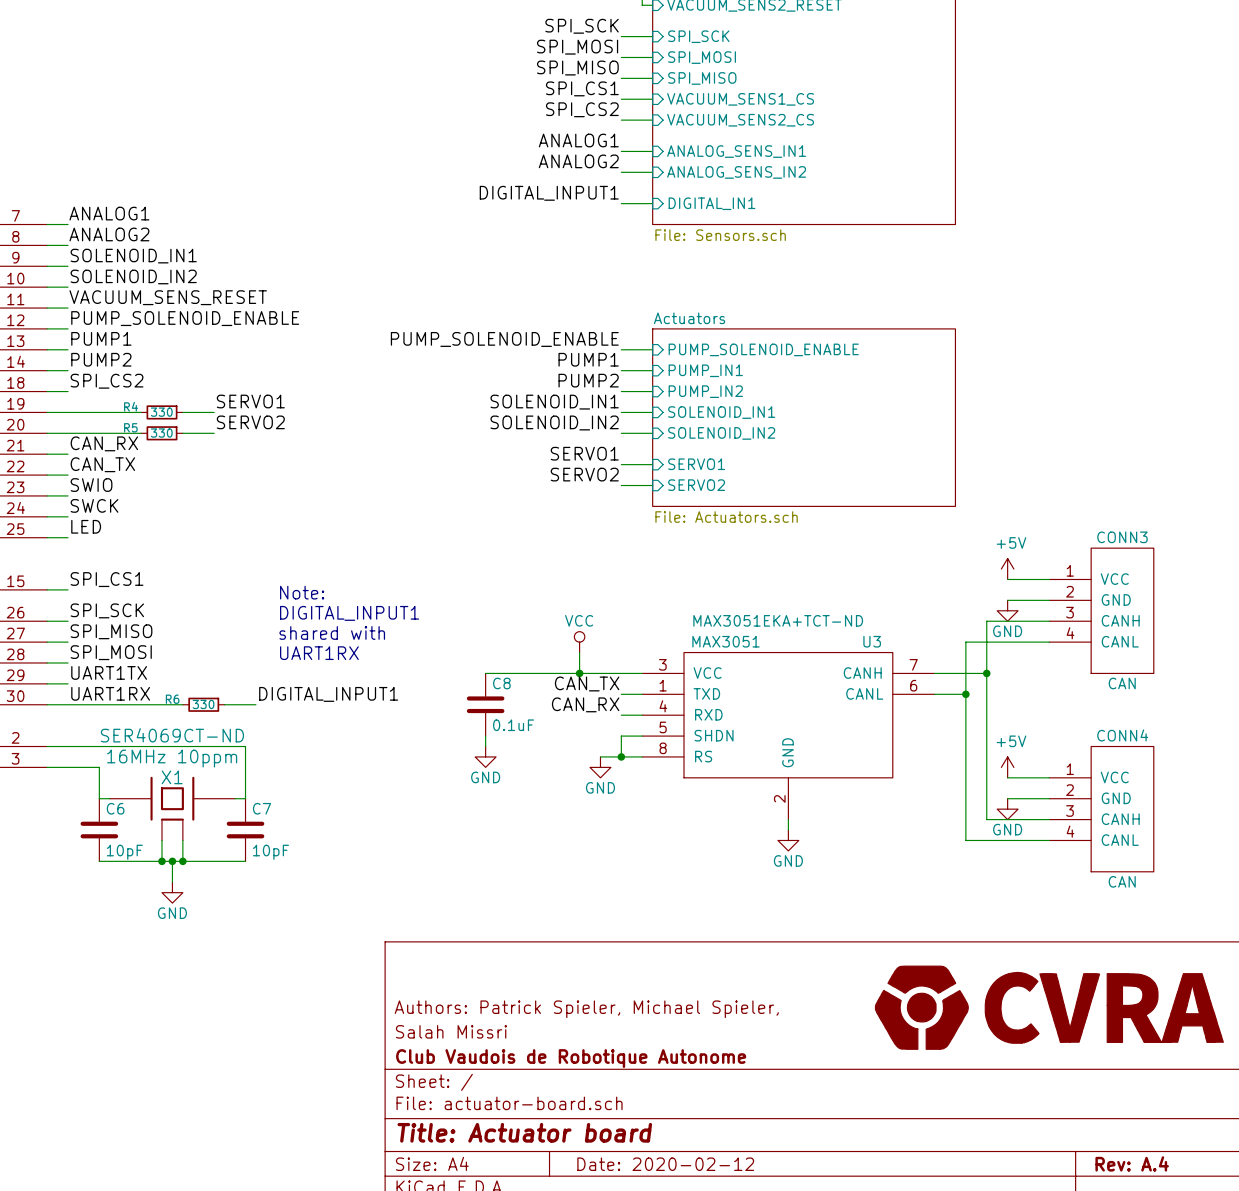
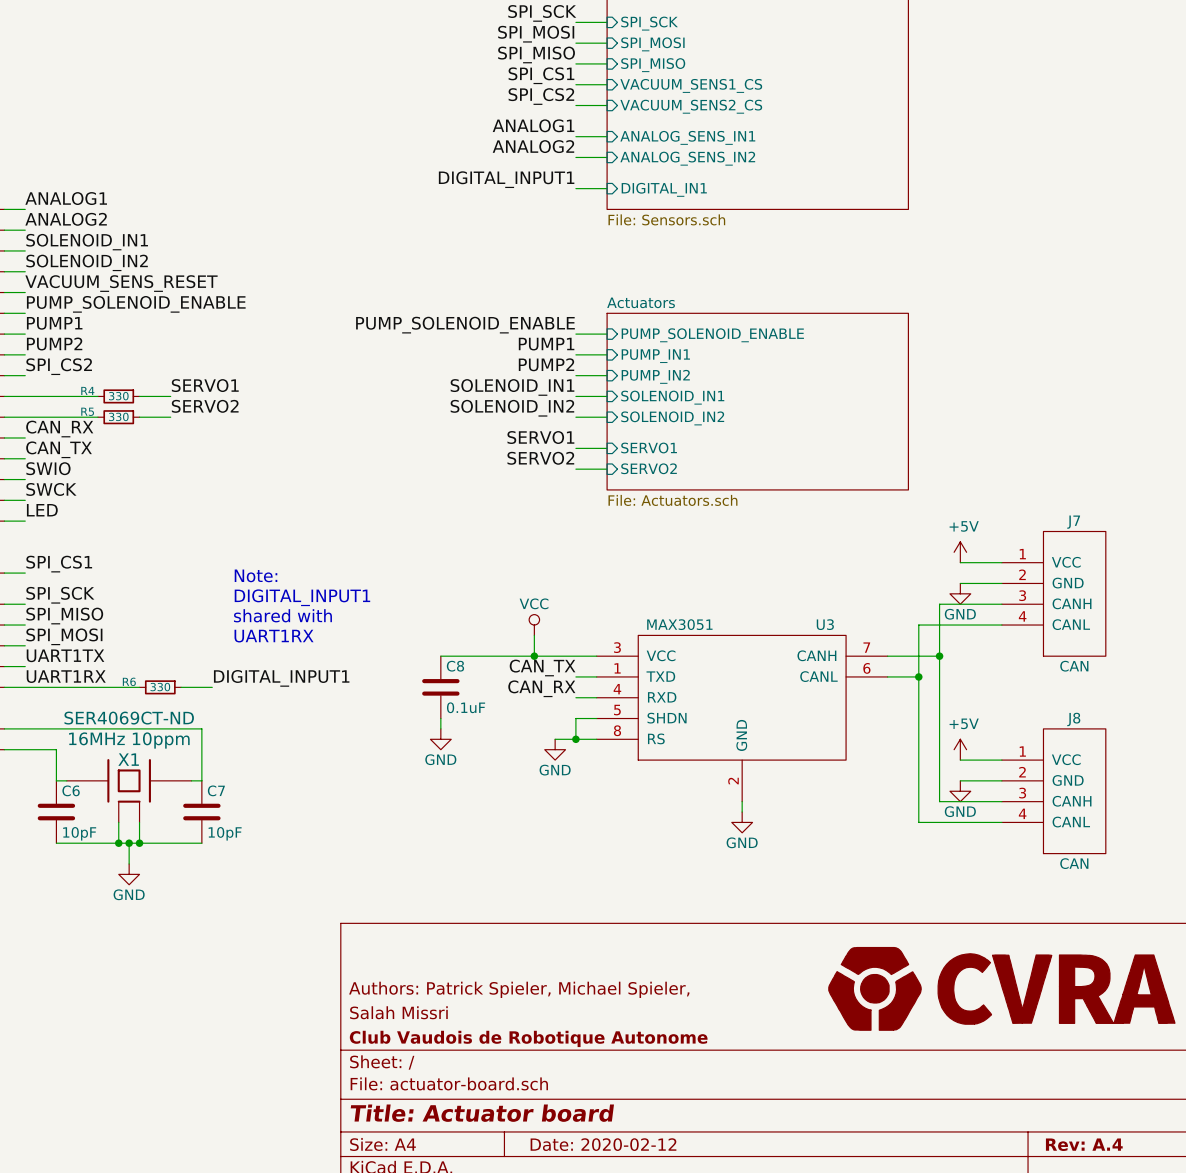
CONN3 name: CONN3 (1122, 537) -> J7 (1073, 522)
U3 text: MAX3051EKA+TCT-ND (778, 620) -> none
CONN4 name: CONN4 (1122, 735) -> J8 (1073, 719)

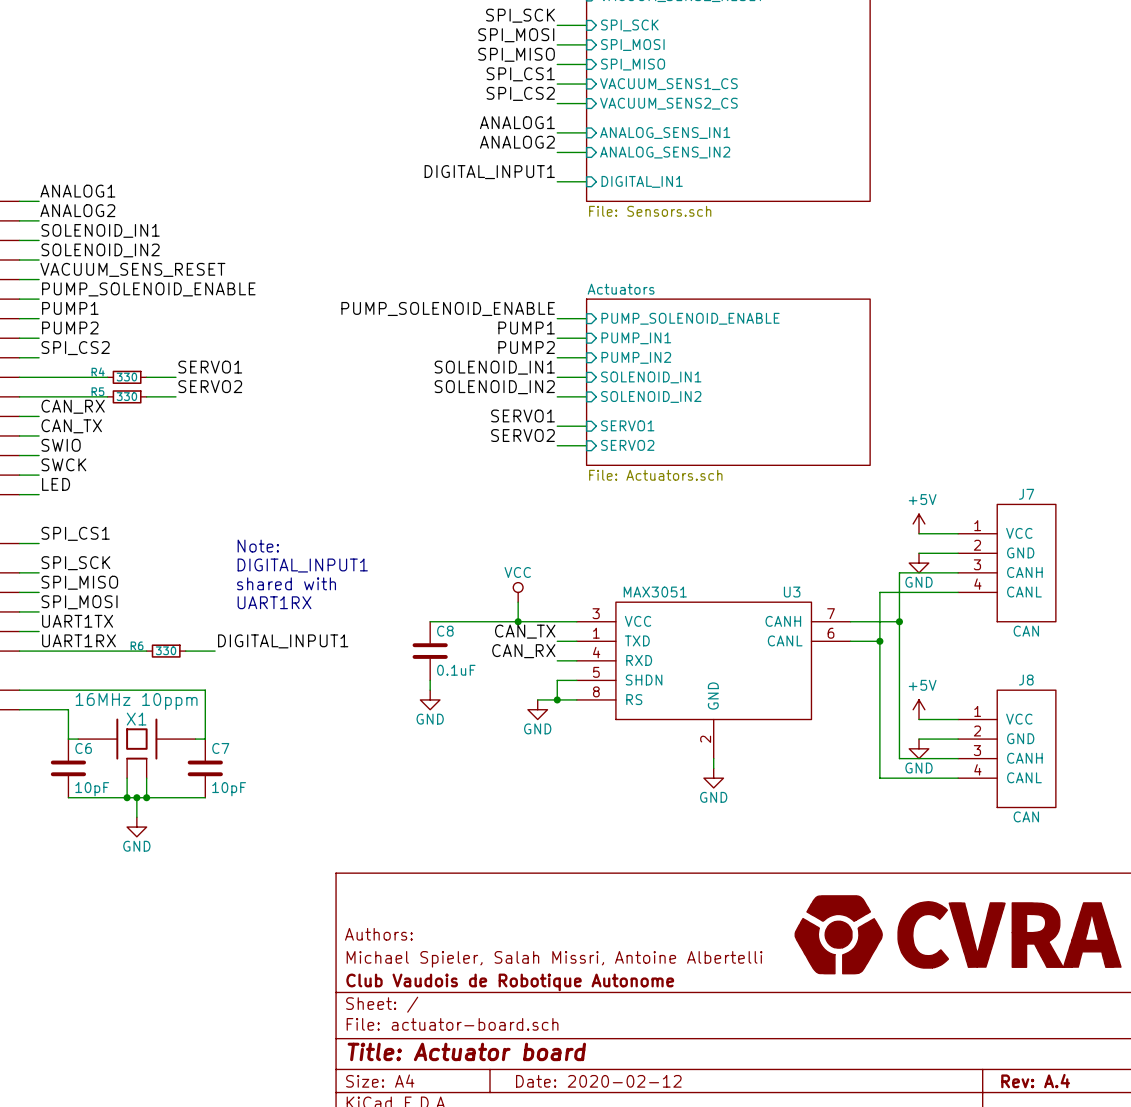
X1 text: SER4069CT-ND (129, 718) -> none
title block: Authors: Patrick Spieler, Michael Spieler, (519, 989) -> Authors: (378, 934)
title block: Salah Missri (398, 1012) -> Michael Spieler, Salah Missri, Antoine Albertelli (554, 959)

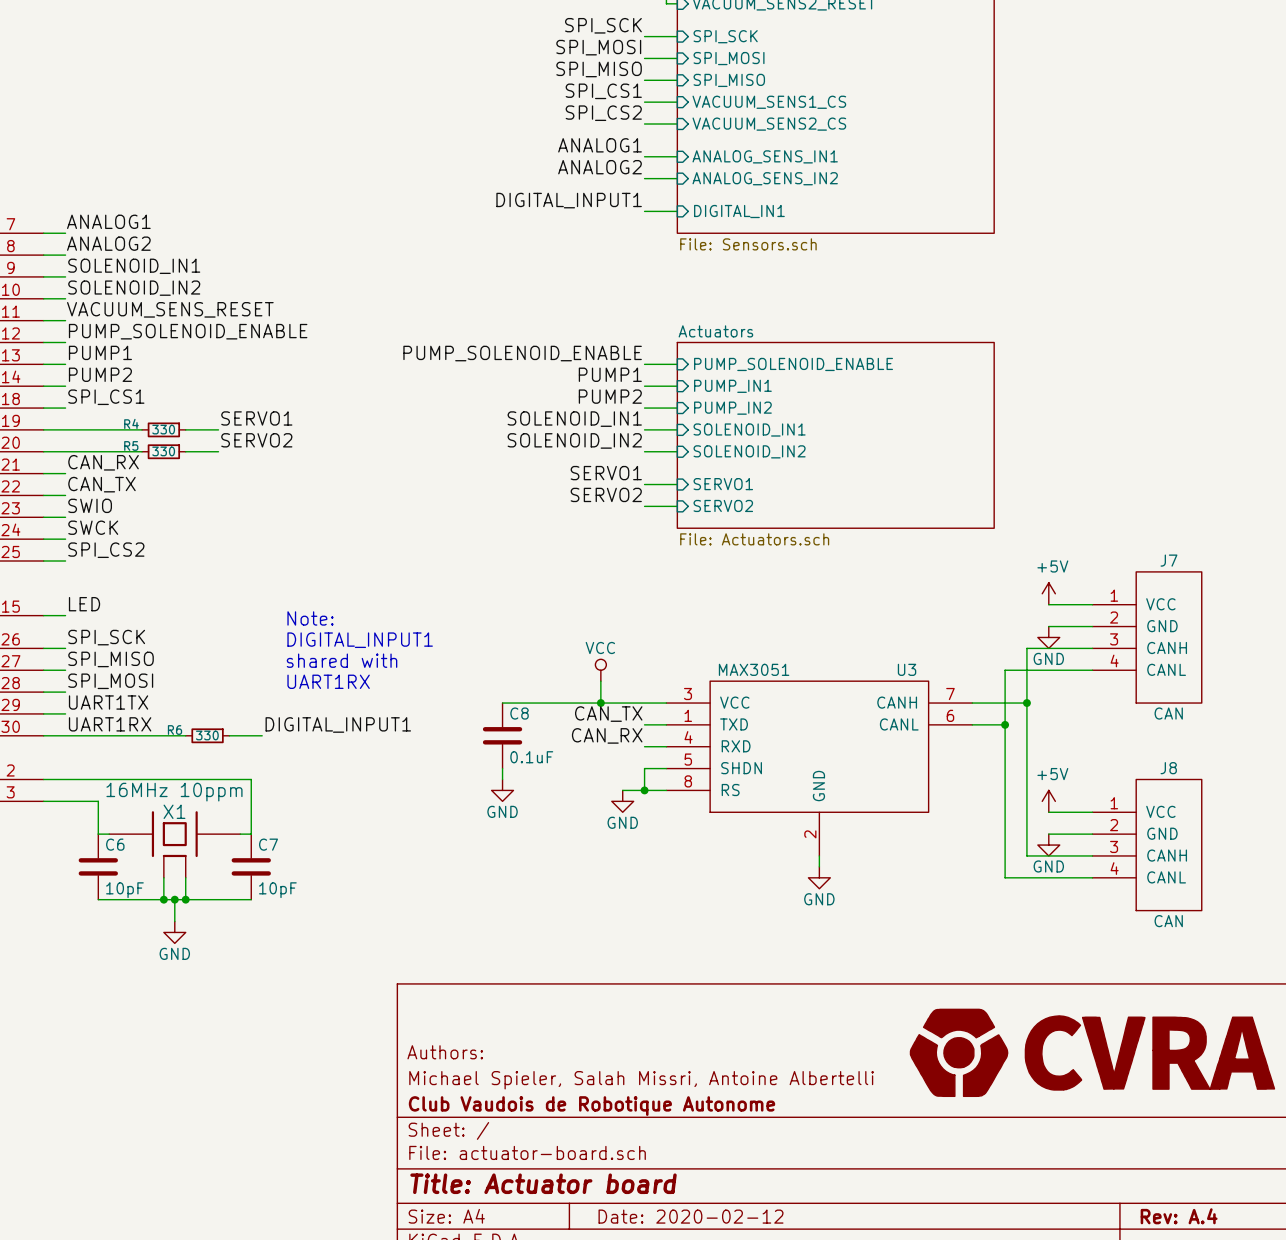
label: SPI_CS2 (75, 348) -> SPI_CS1 (106, 397)
label: LED (56, 484) -> SPI_CS2 (106, 550)
label: SPI_CS1 (75, 533) -> LED (84, 604)

